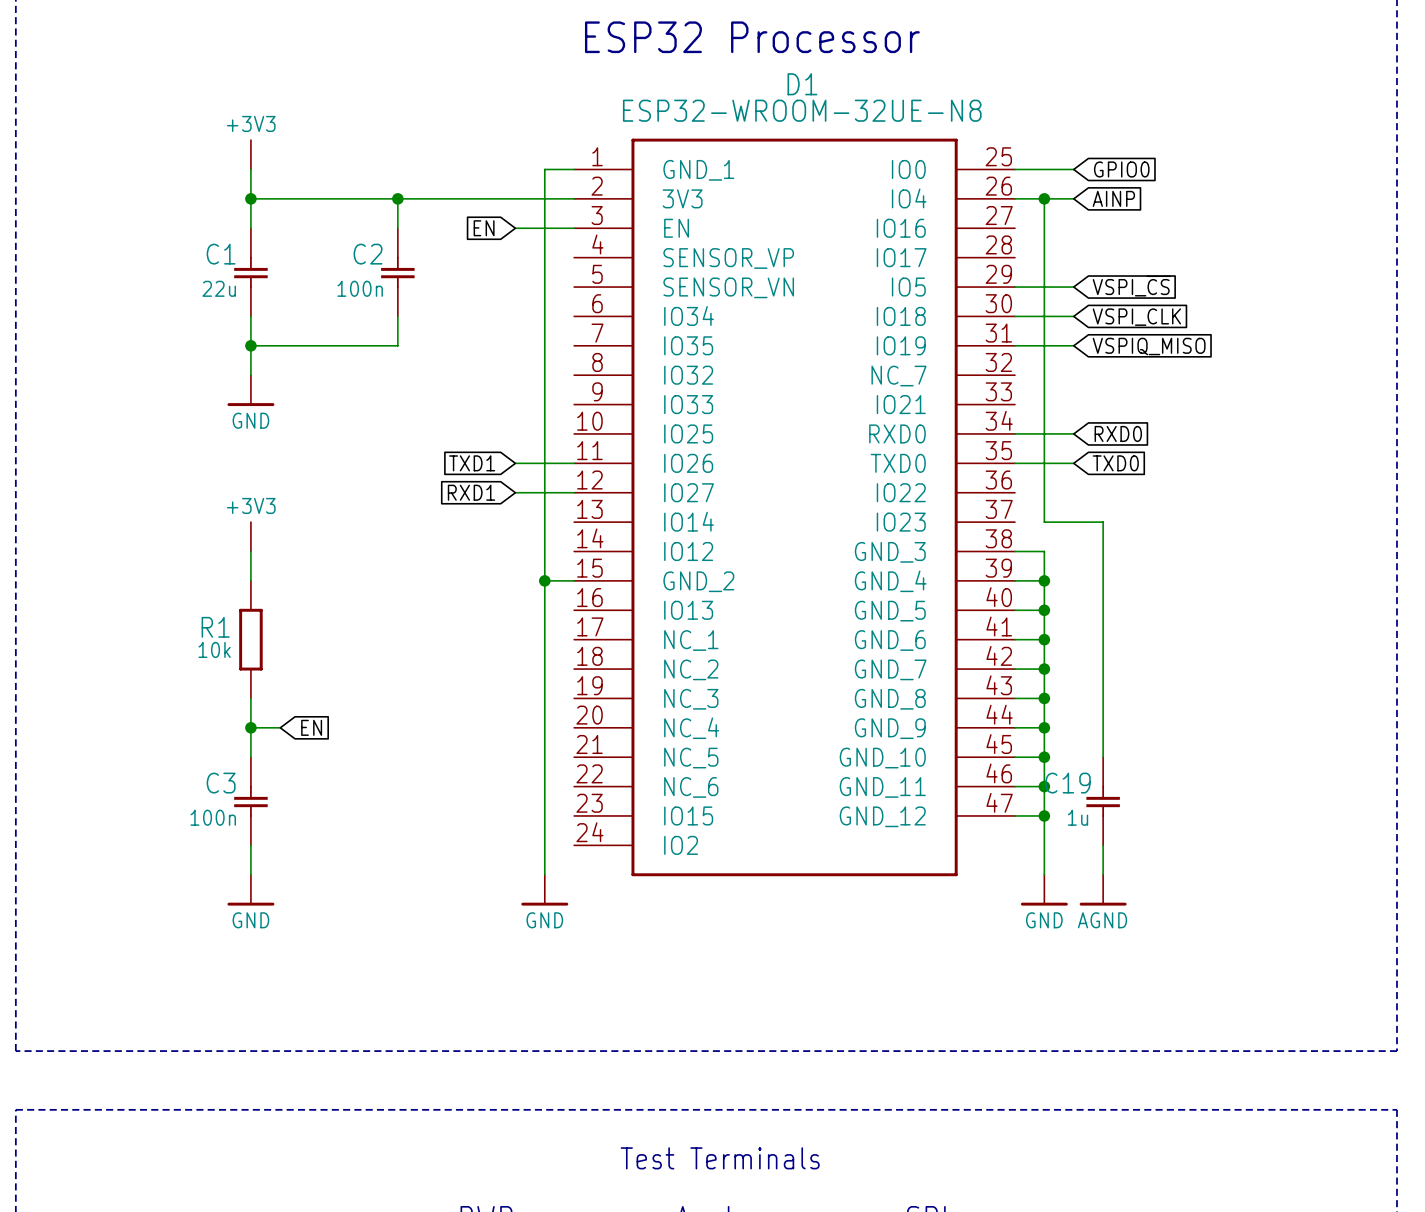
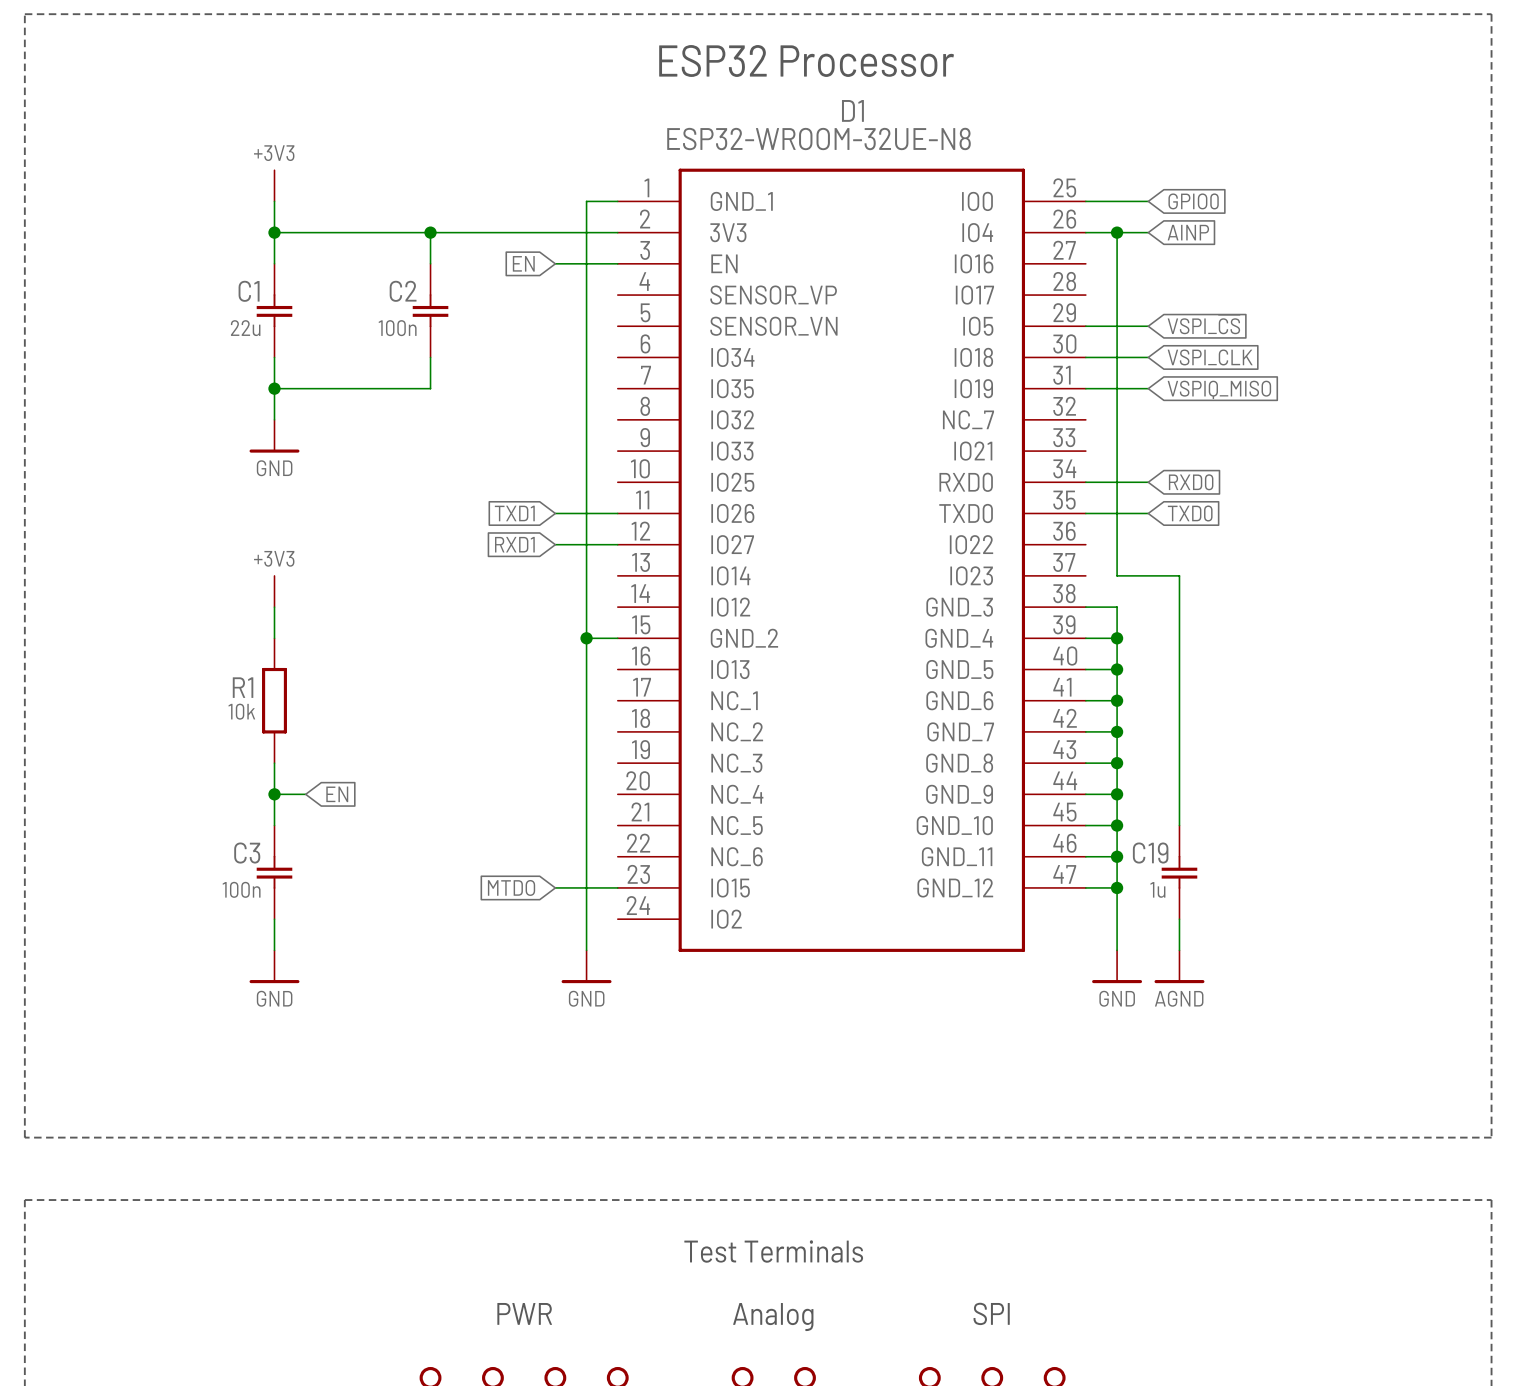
global label: none -> MTDO (511, 887)
wire: none -> (555, 887) (617, 887)

